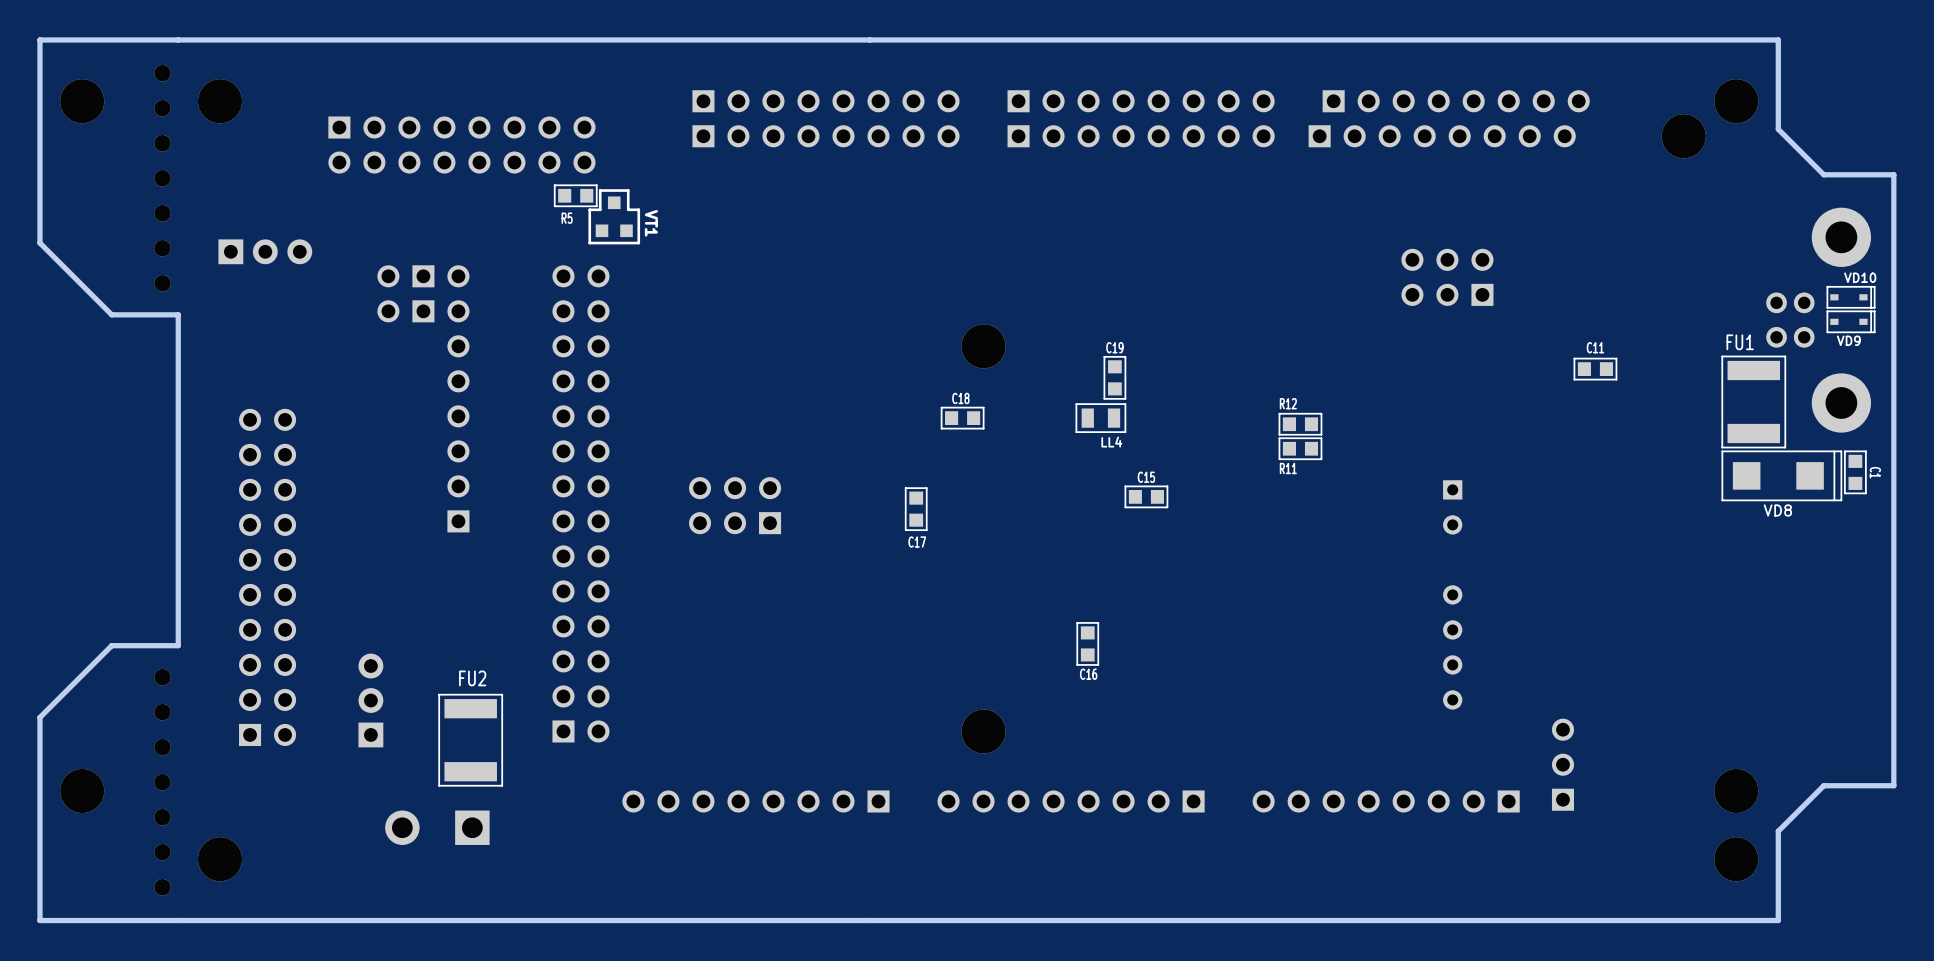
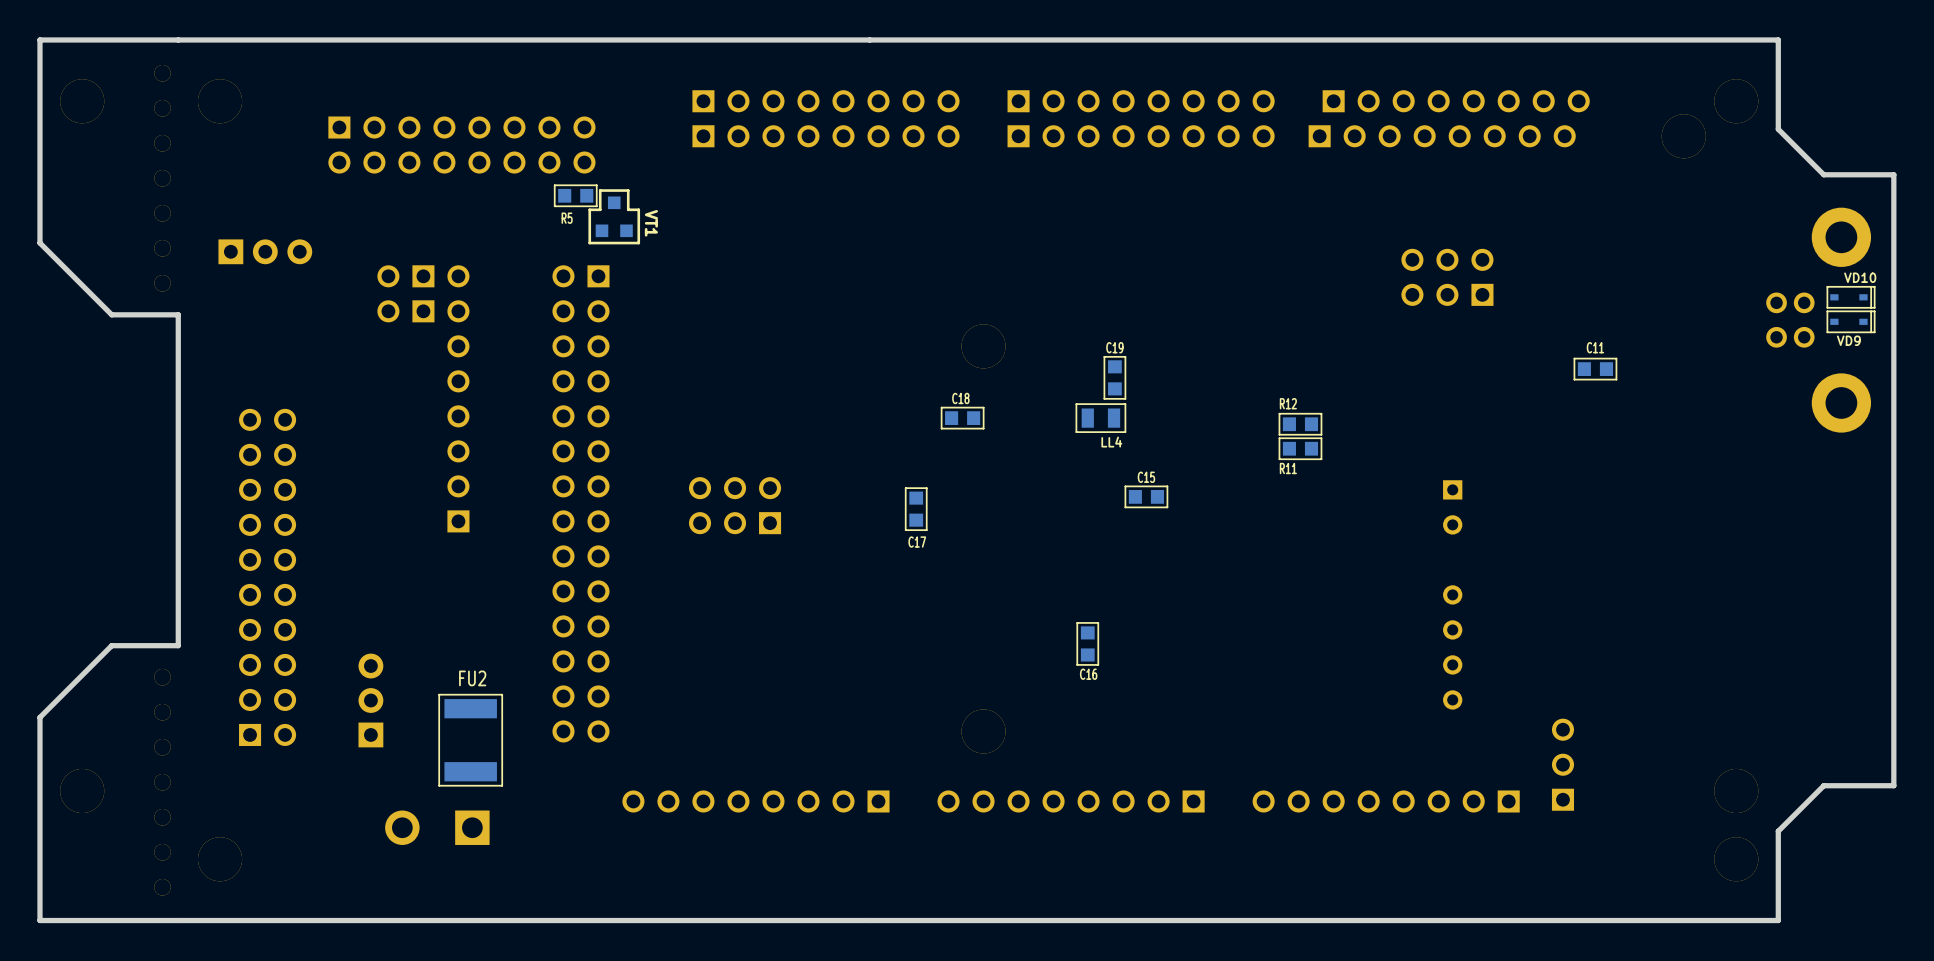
FU1: (1753, 402) -> none
C1: (1855, 472) -> none
VD8: (1781, 475) -> none
part rotation: 0° (580, 503) -> 180° (580, 503)

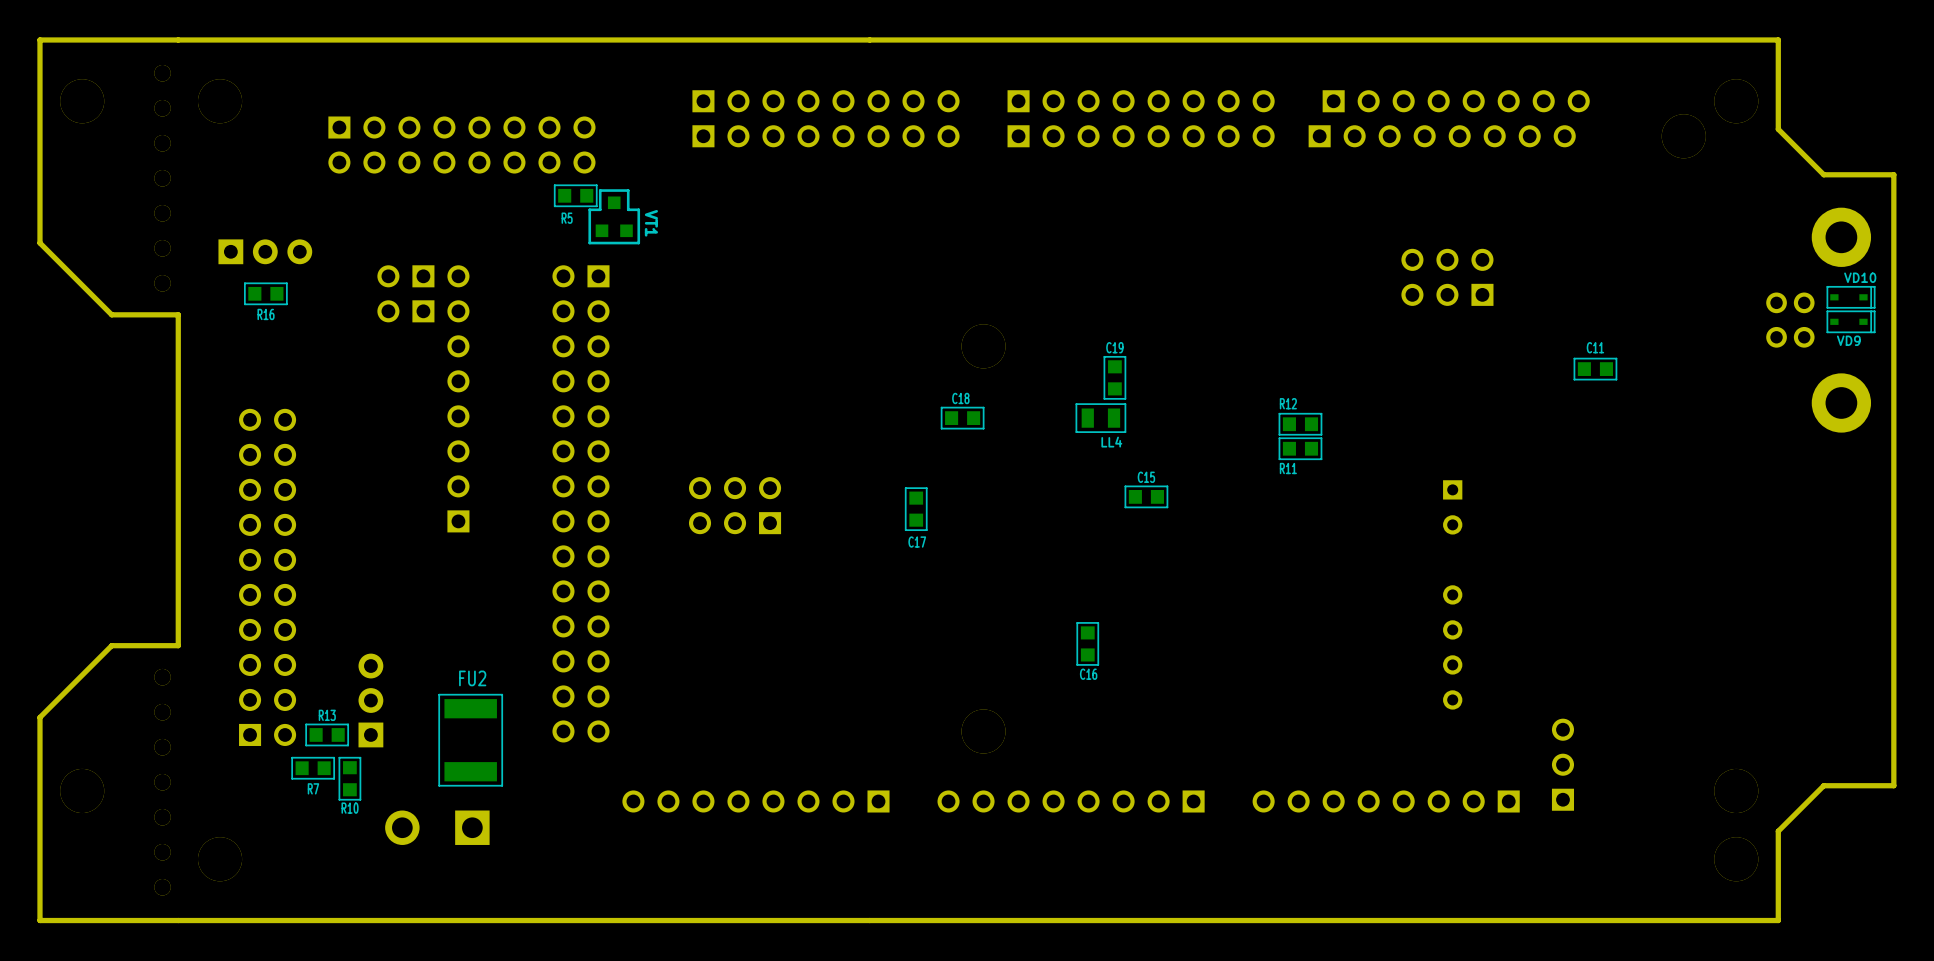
R16: none -> (265, 293)
R13: none -> (327, 734)
R7: none -> (313, 768)
R10: none -> (349, 778)

